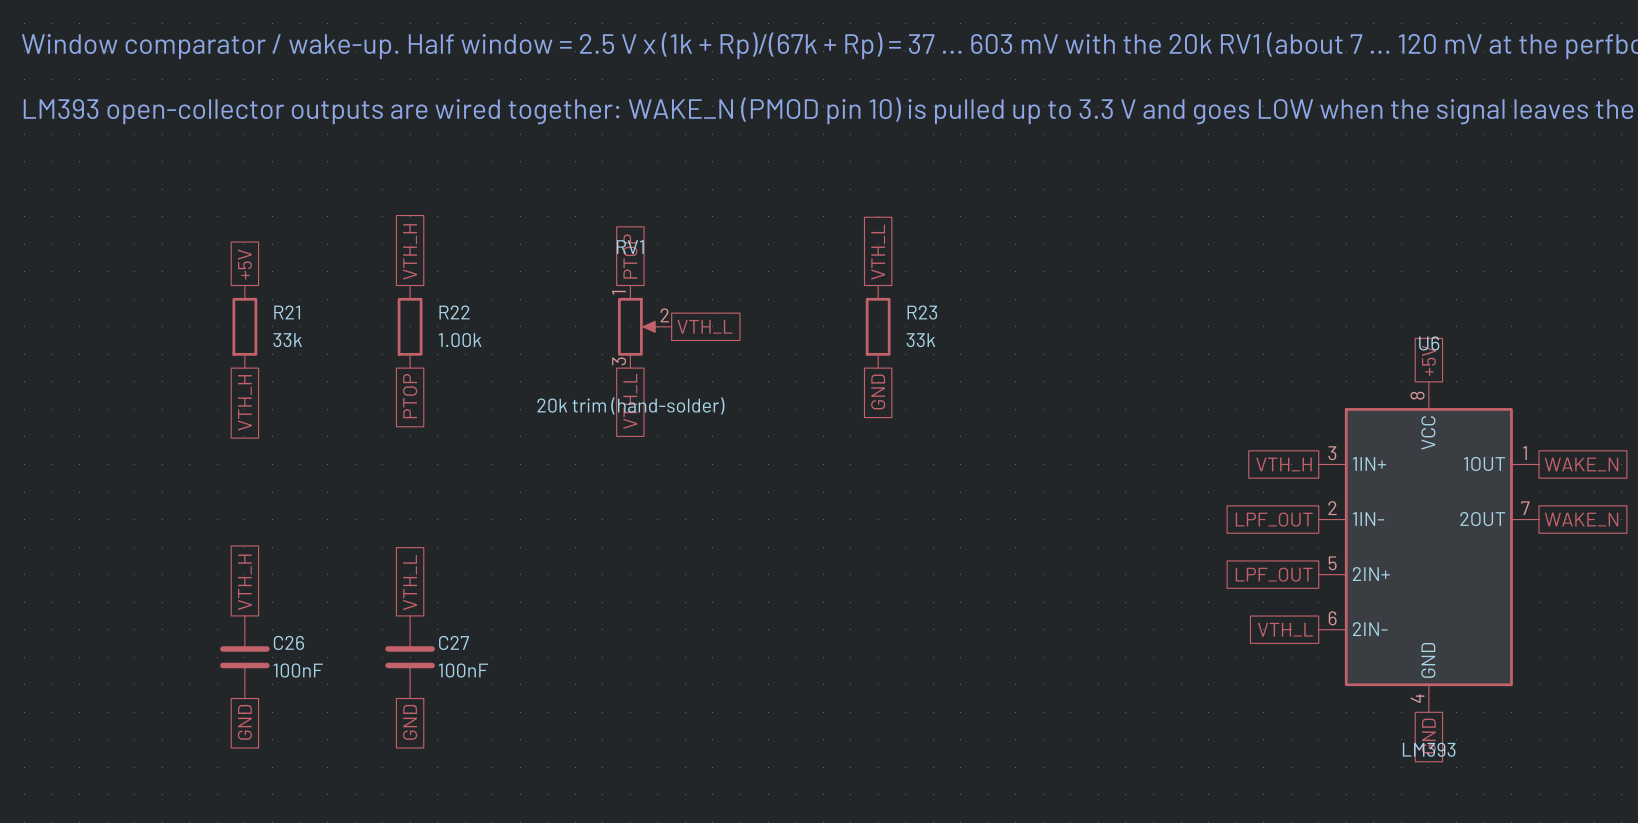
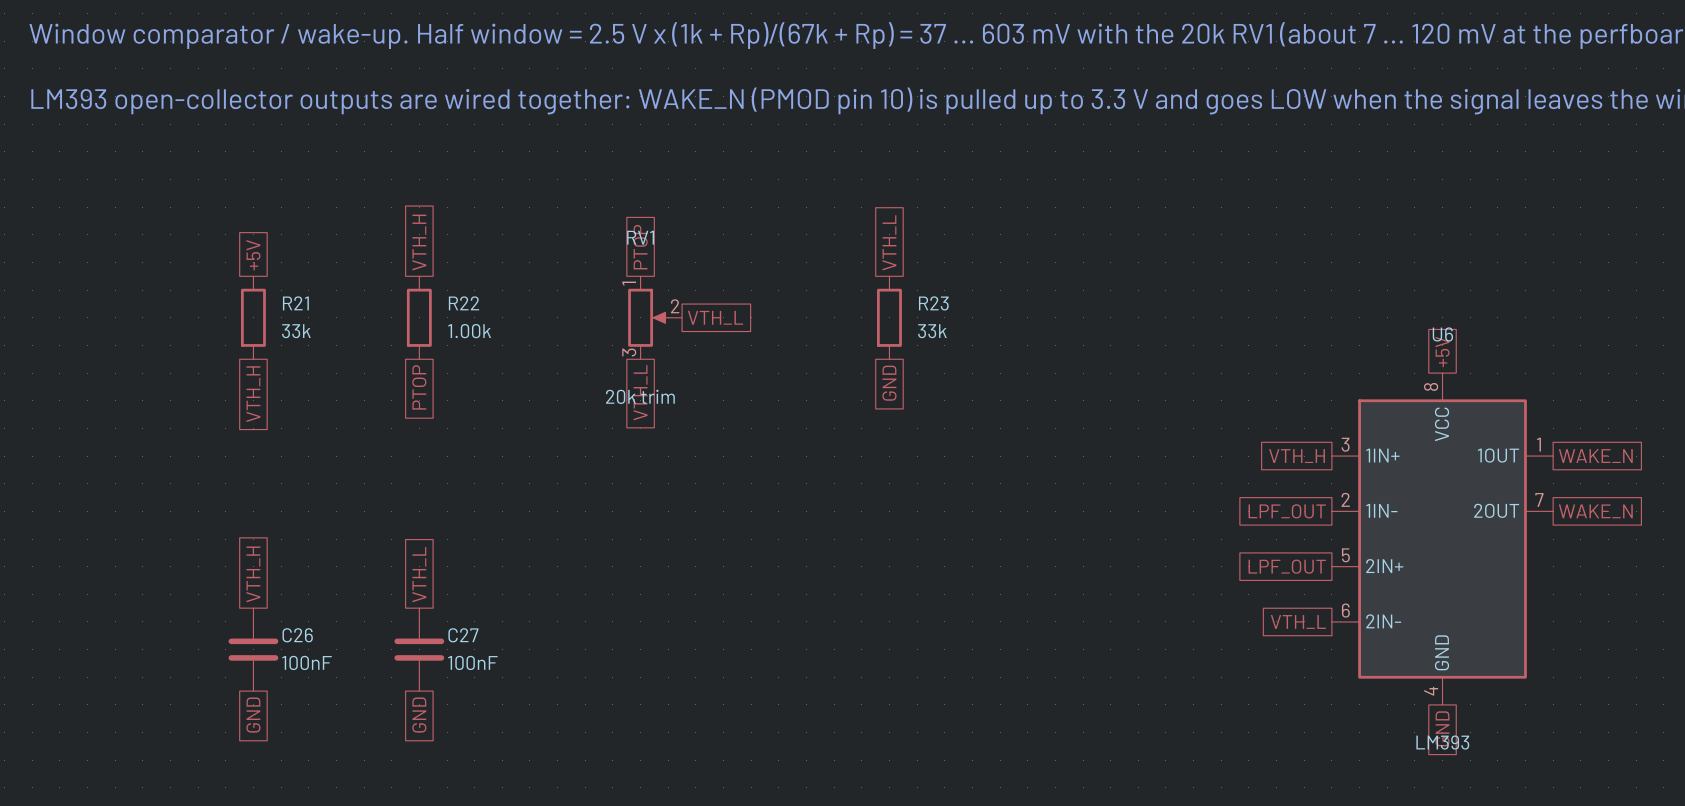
RV1 value: 20k trim (hand-solder) (630, 405) -> 20k trim (640, 396)

